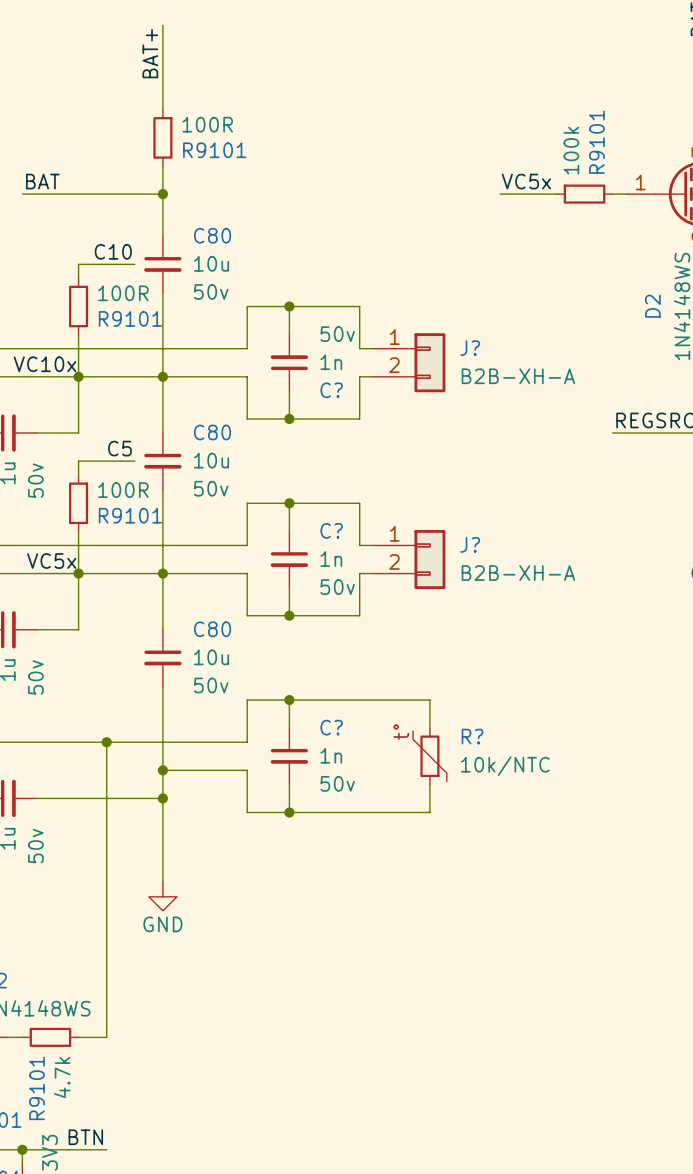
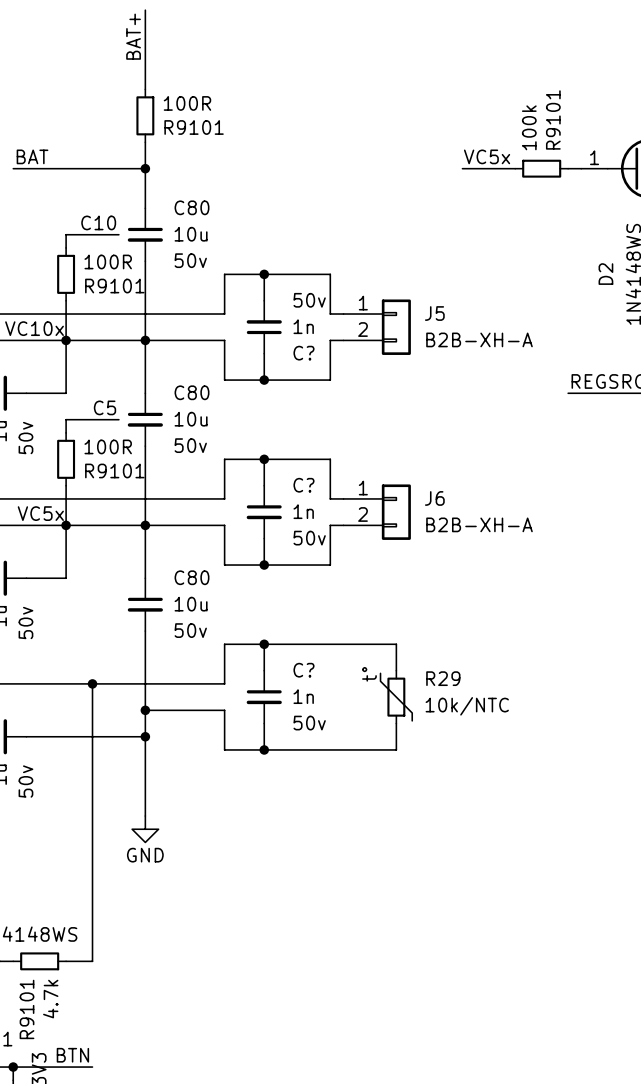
J? name: J? (470, 348) -> J5 (434, 313)
J? name: J? (470, 544) -> J6 (434, 498)
R? name: R? (472, 736) -> R29 (443, 678)

